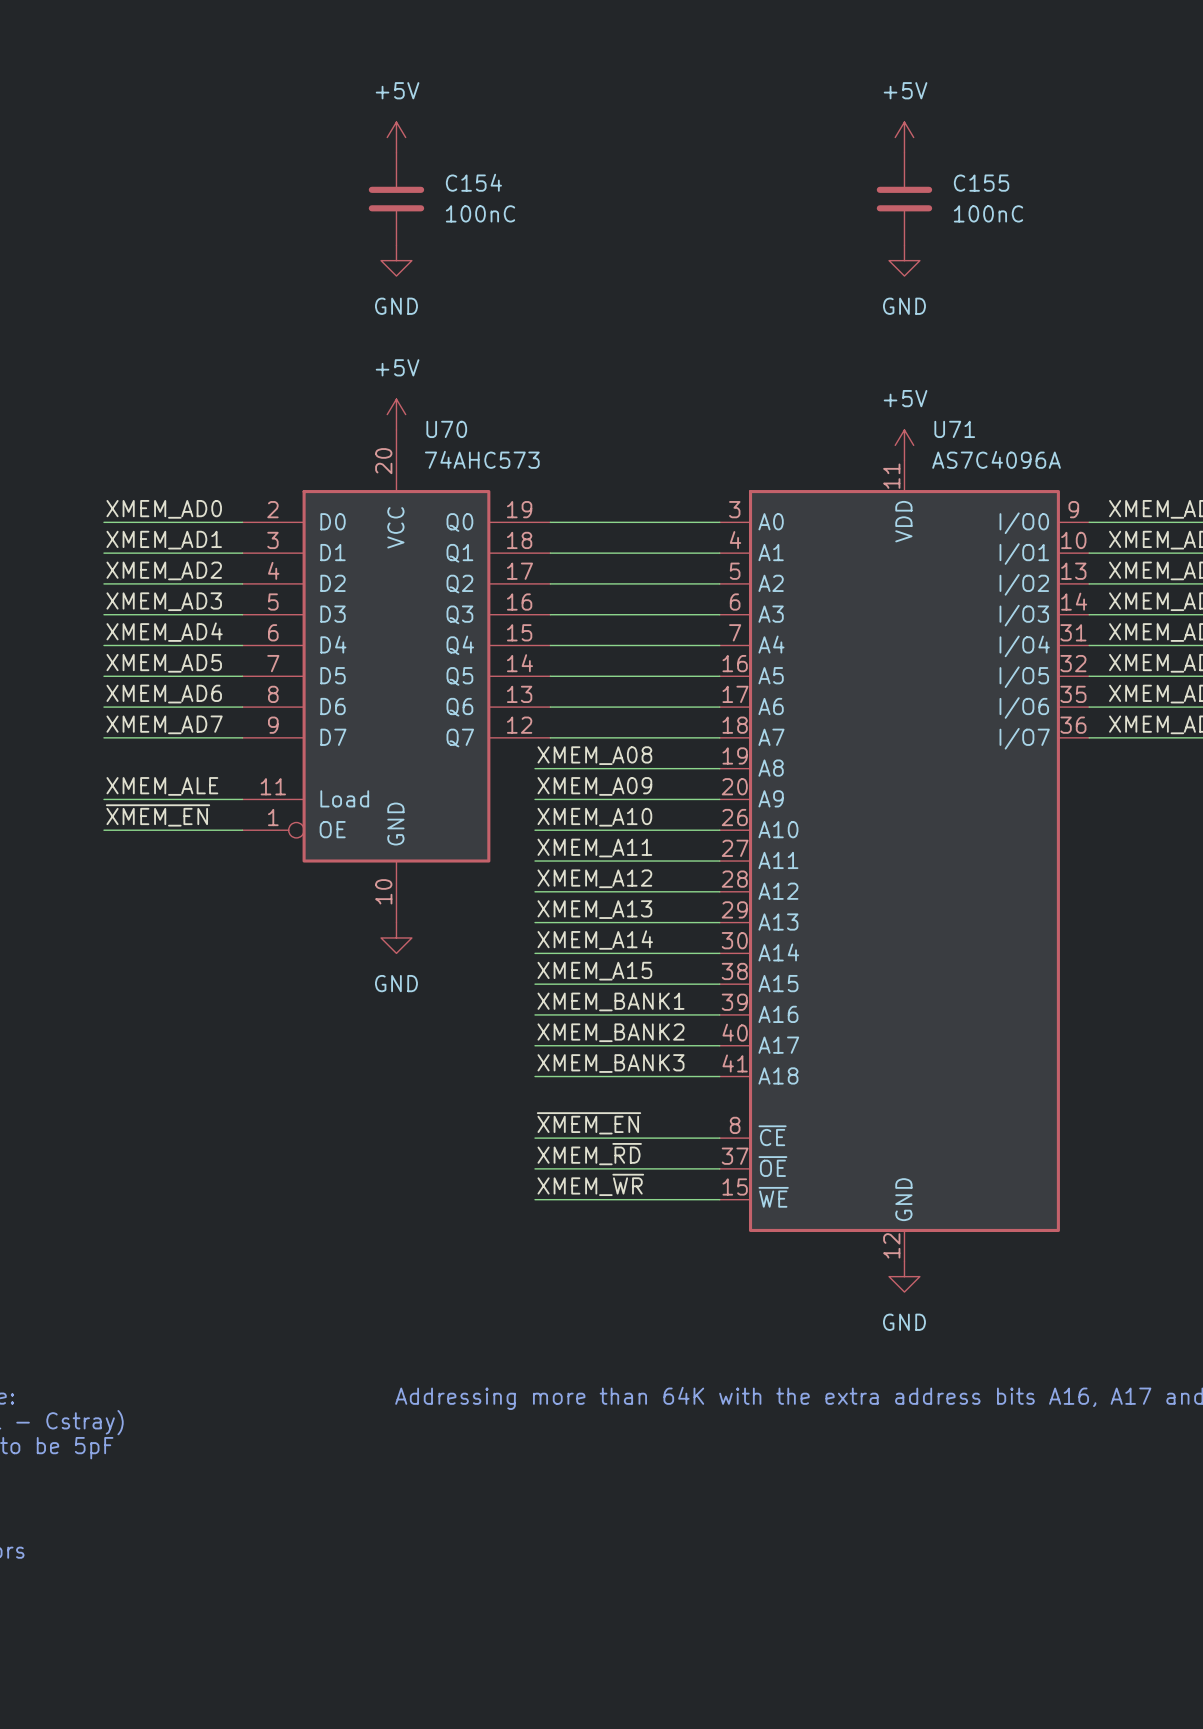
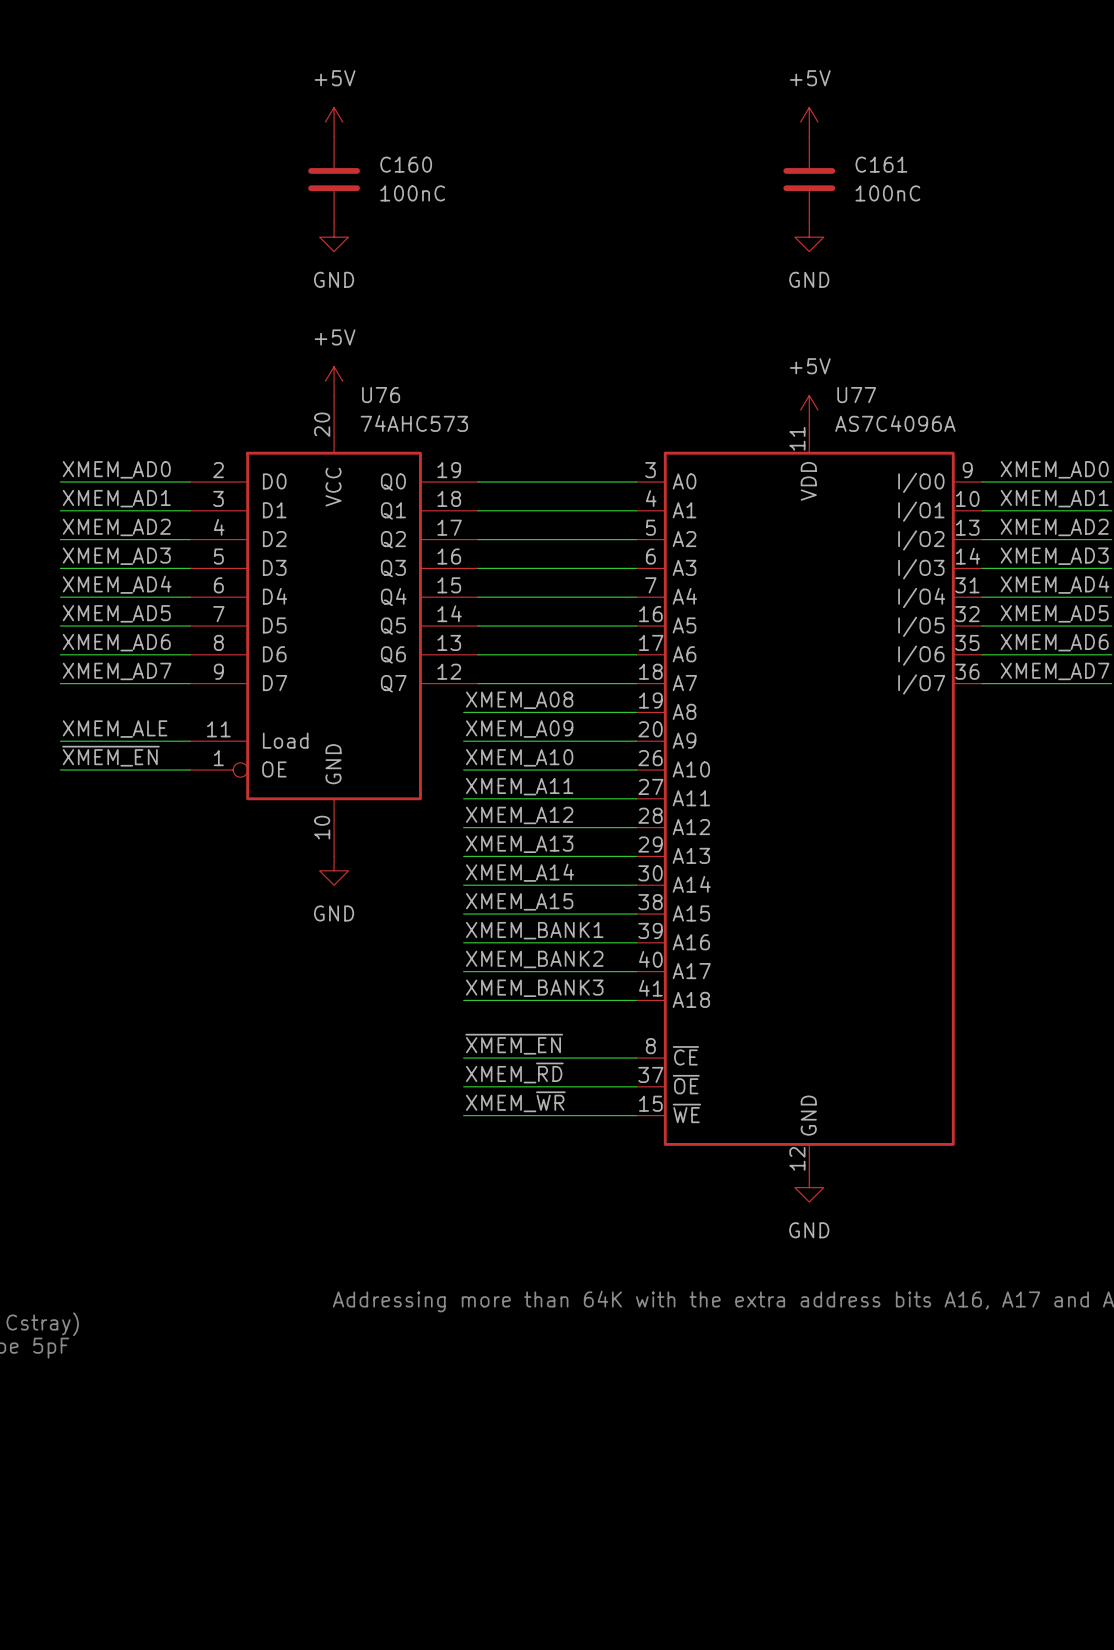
C154 name: C154 (473, 182) -> C160 (406, 164)
C155 name: C155 (981, 183) -> C161 (881, 164)
U70 name: U70 (446, 429) -> U76 (381, 395)
U71 name: U71 (954, 429) -> U77 (856, 395)

